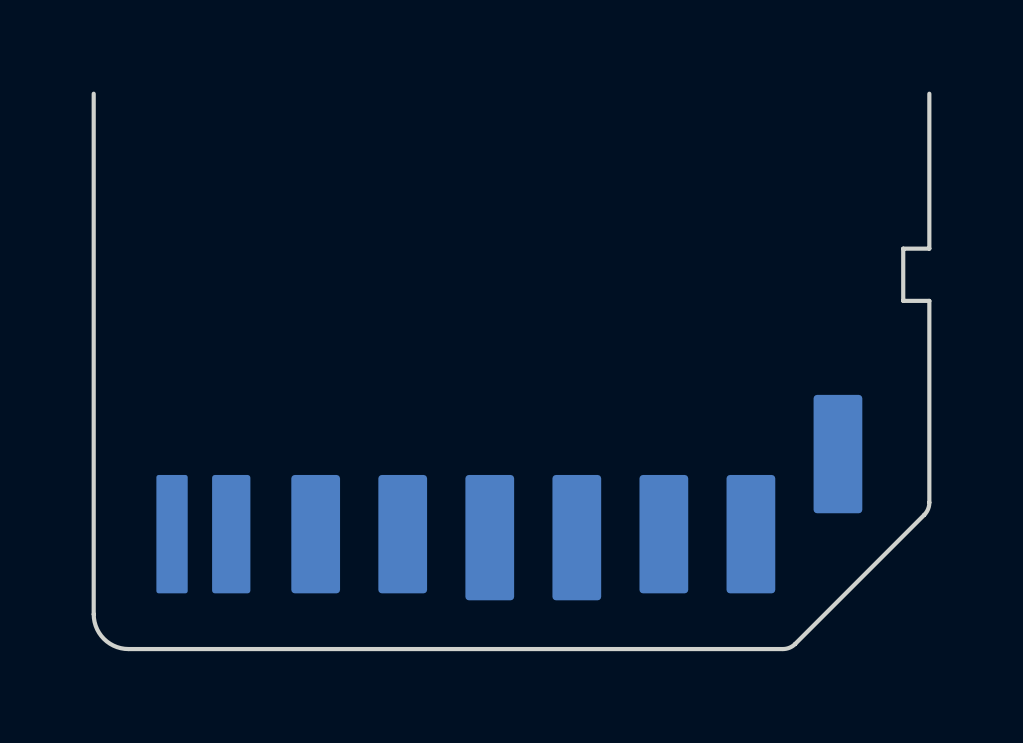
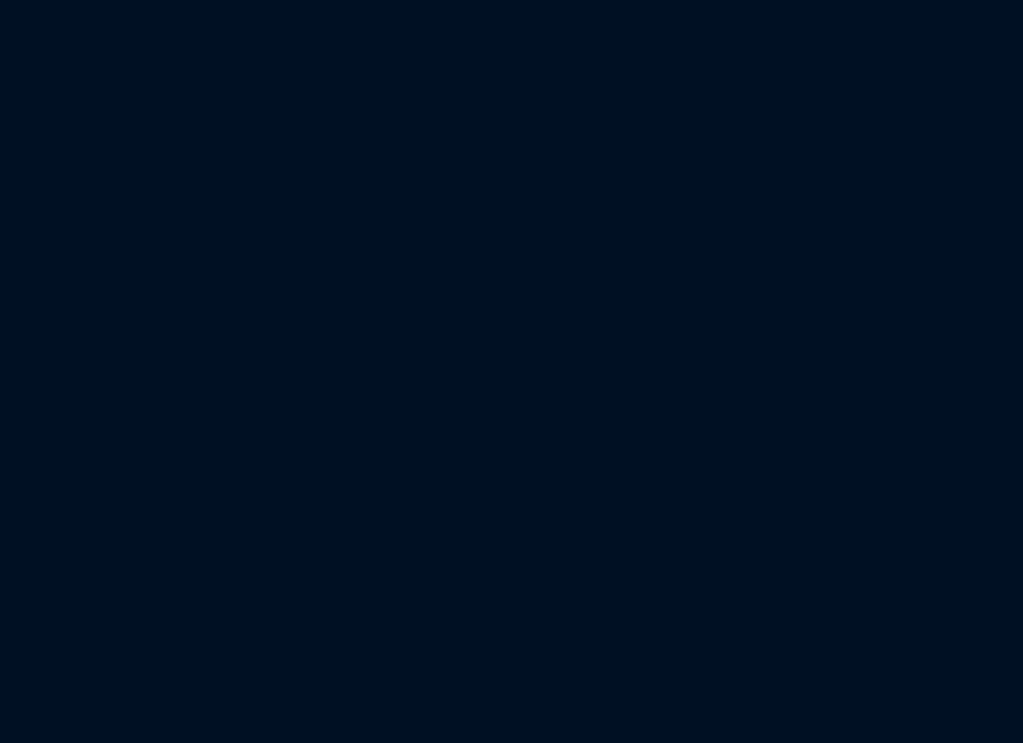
part: (511, 371) -> none

